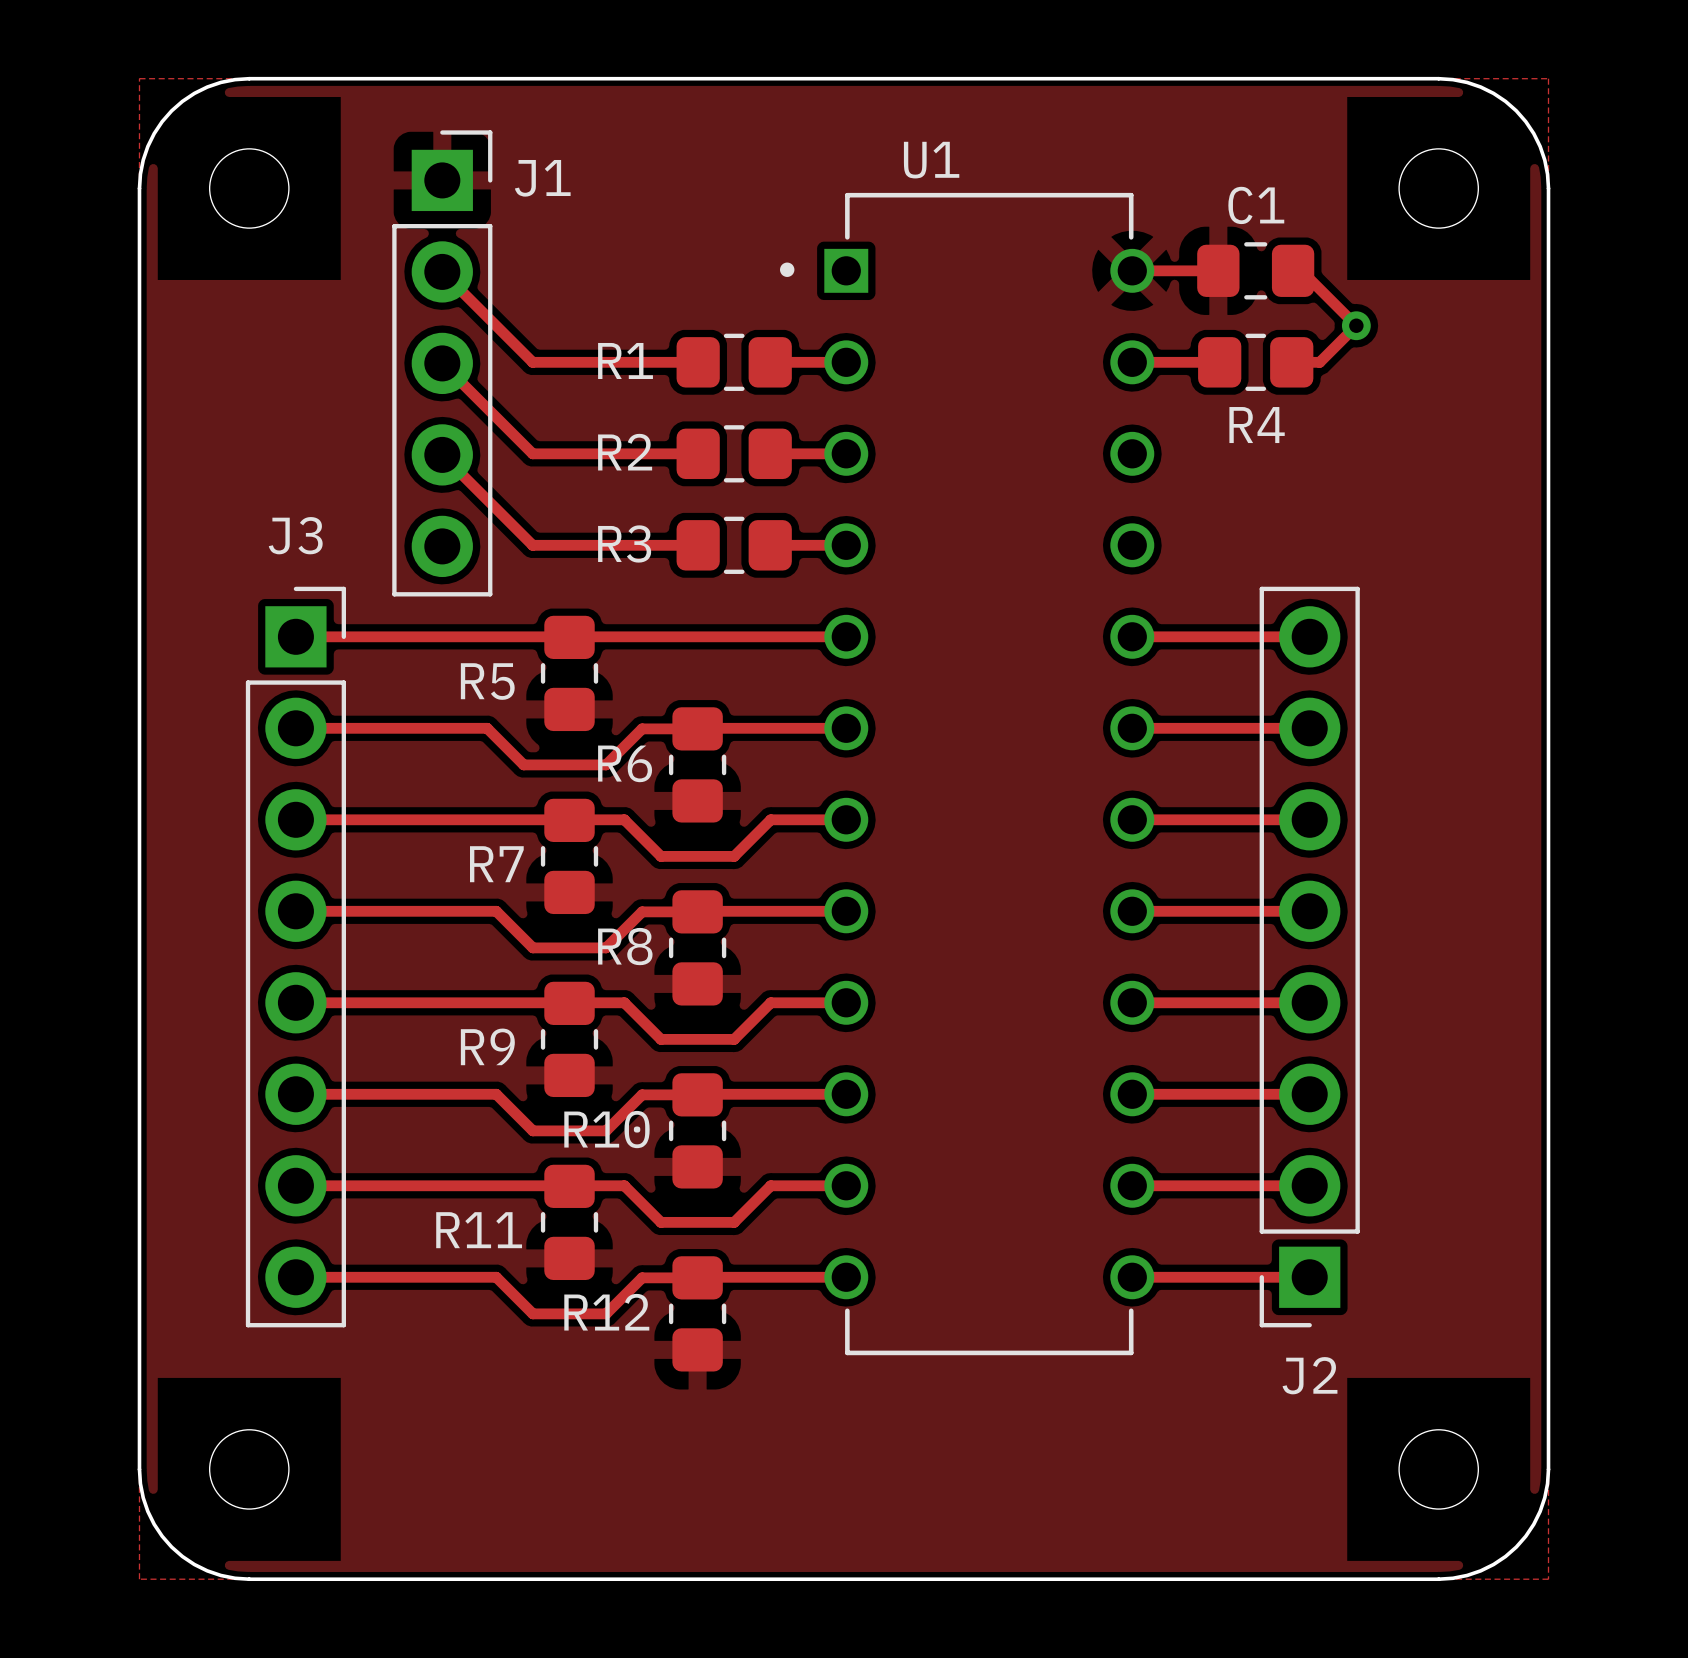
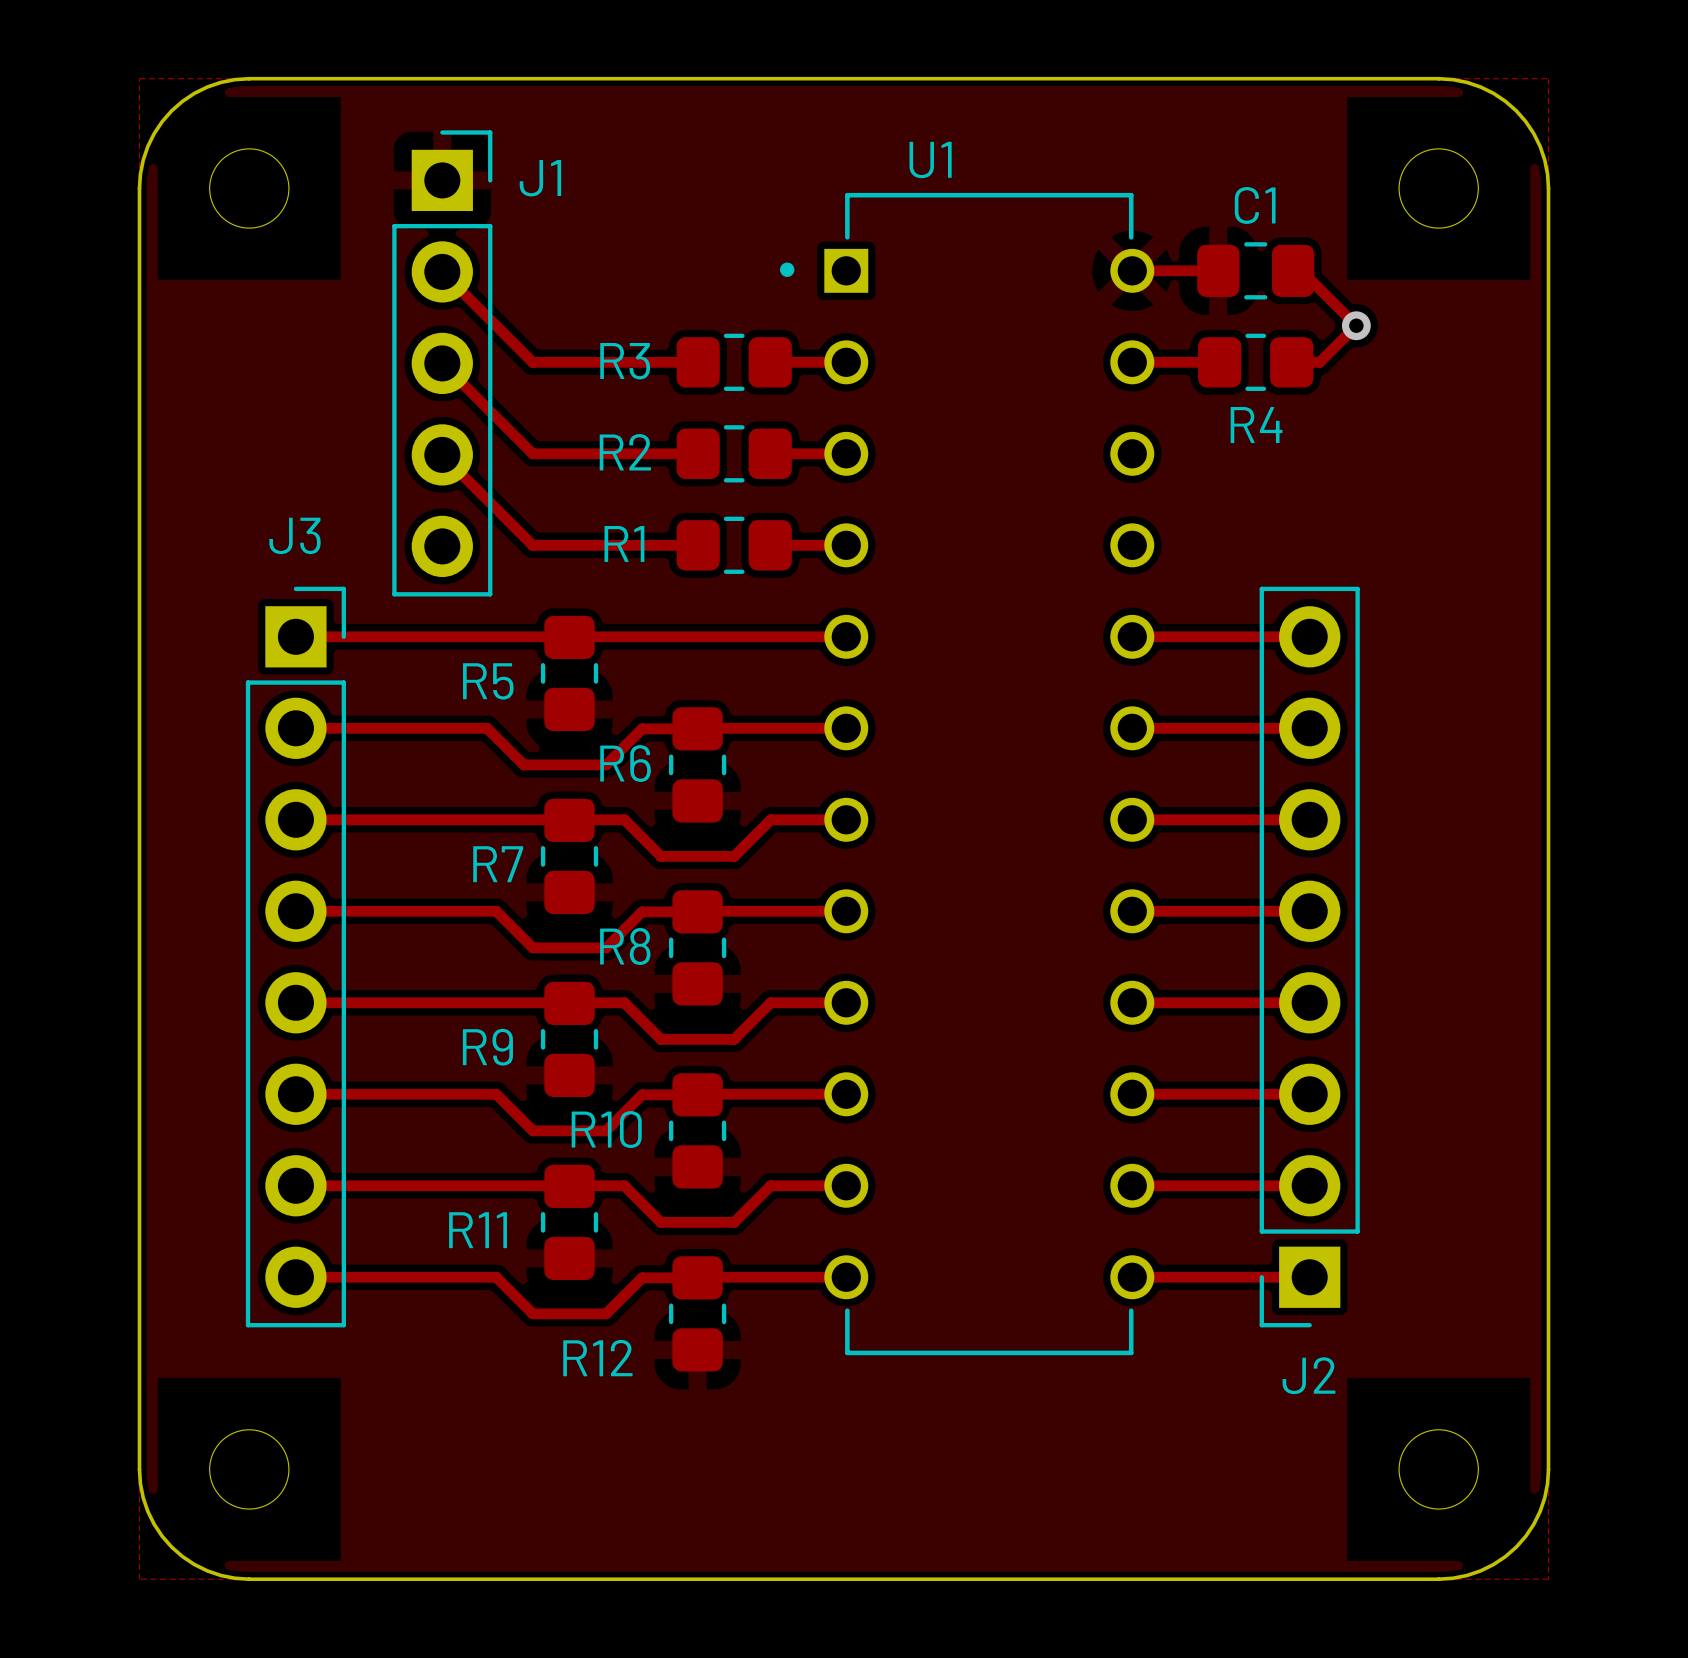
R1 name: R1 (625, 360) -> R3 (625, 361)
R3 name: R3 (624, 543) -> R1 (624, 543)
R12 name position: R12 (606, 1312) -> R12 (597, 1358)

